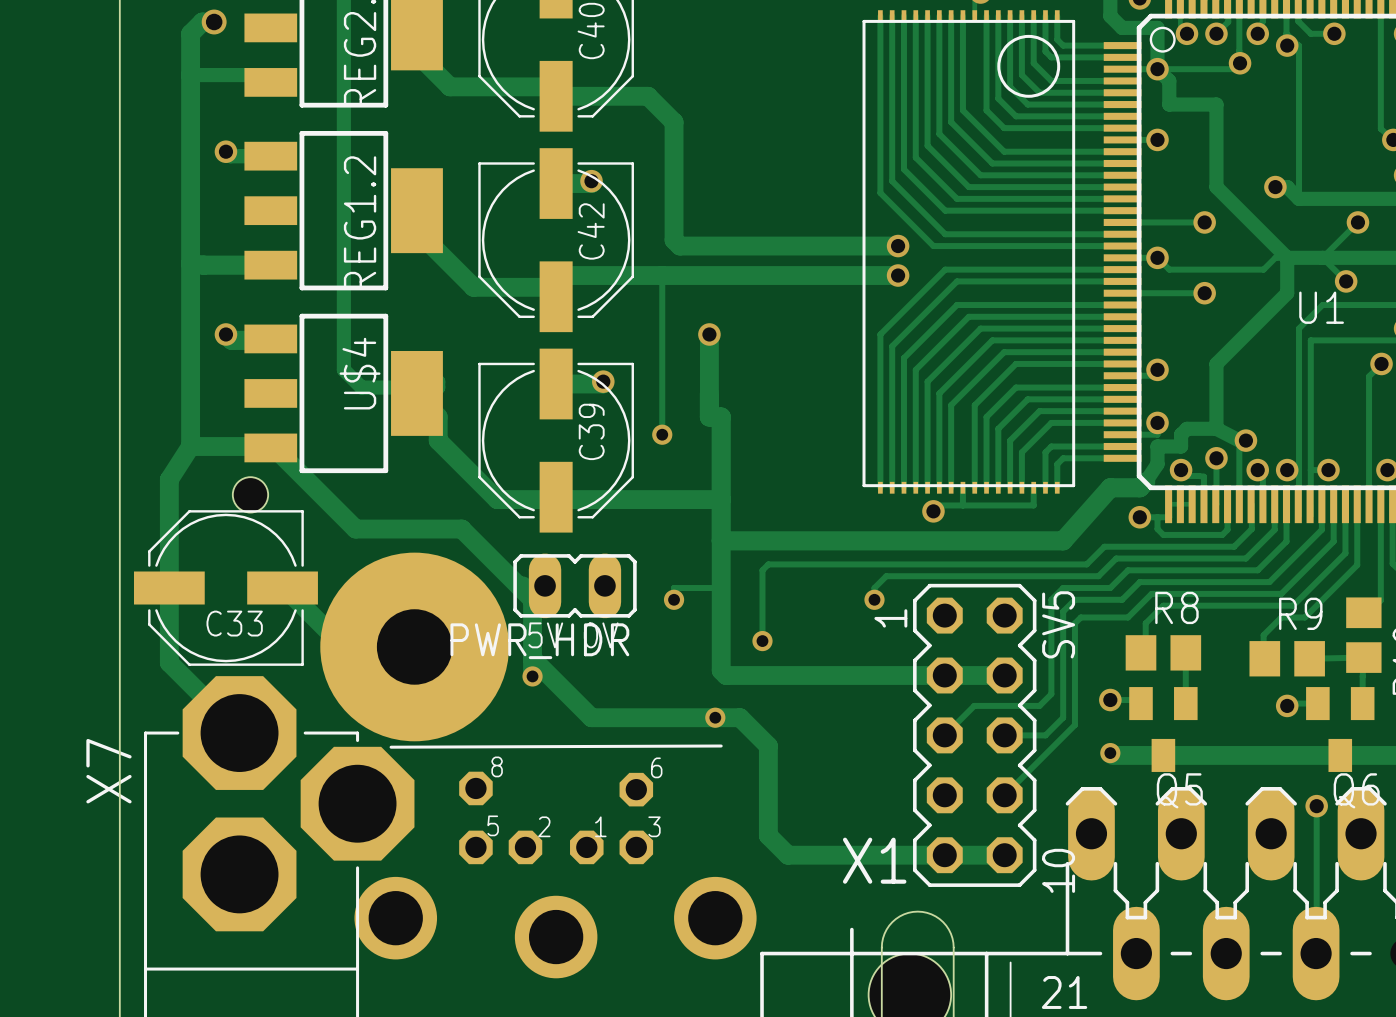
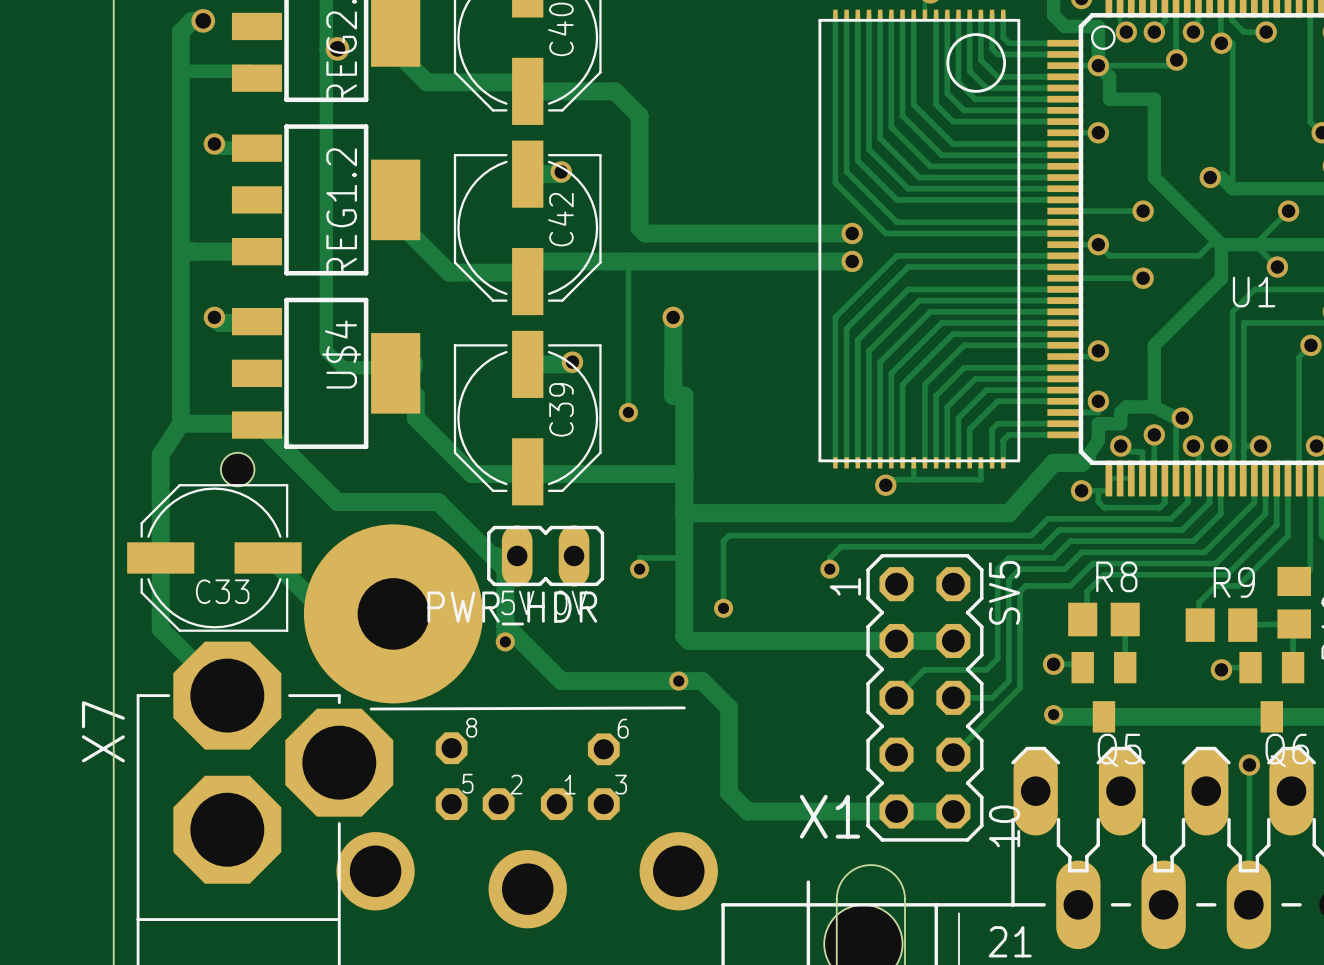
via: none -> (337, 48)

